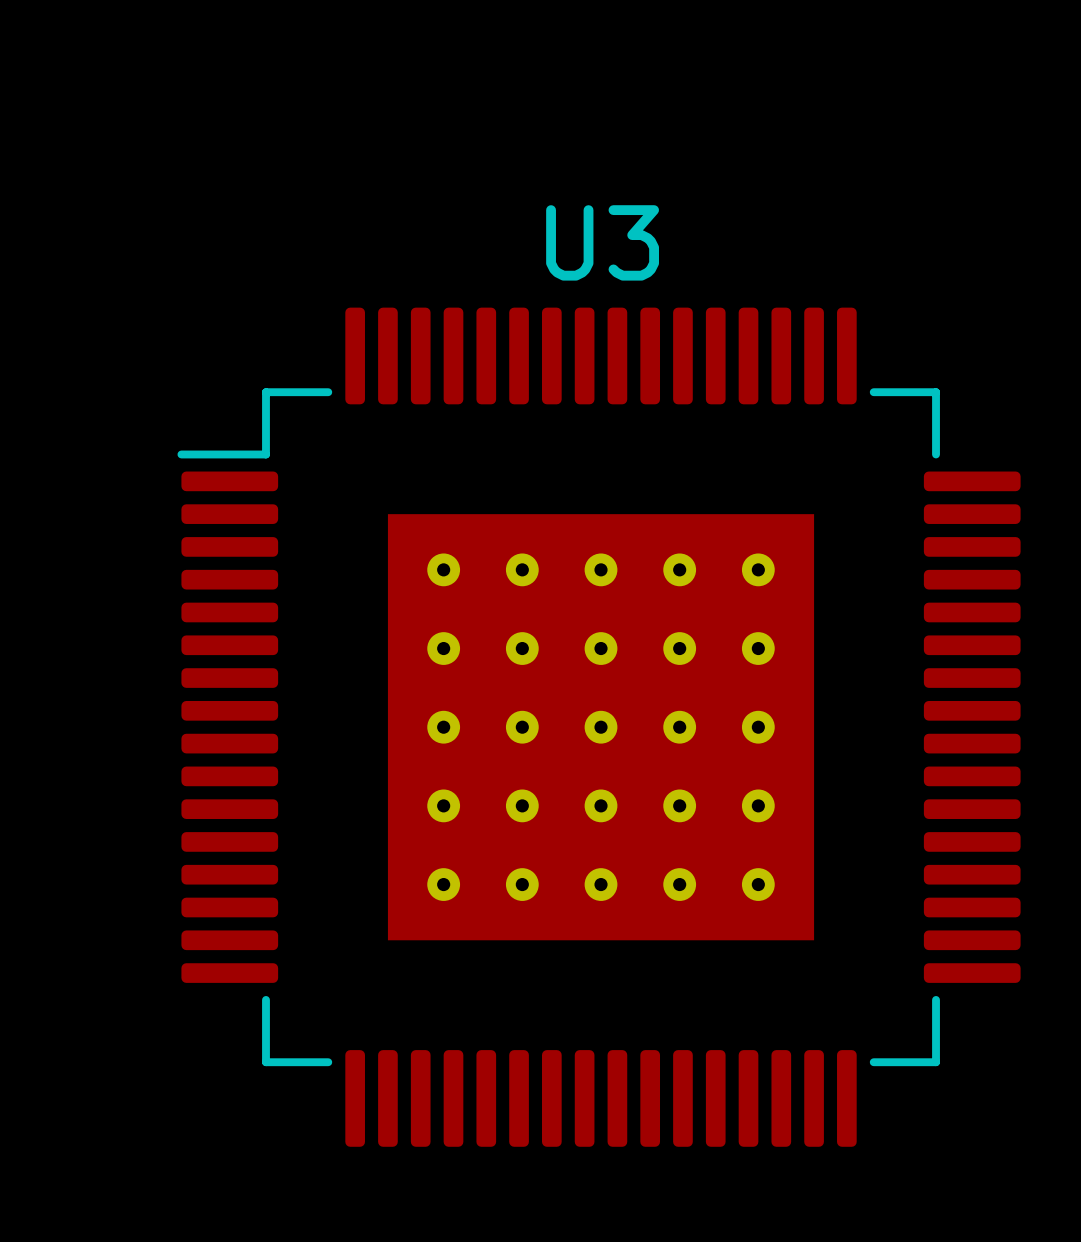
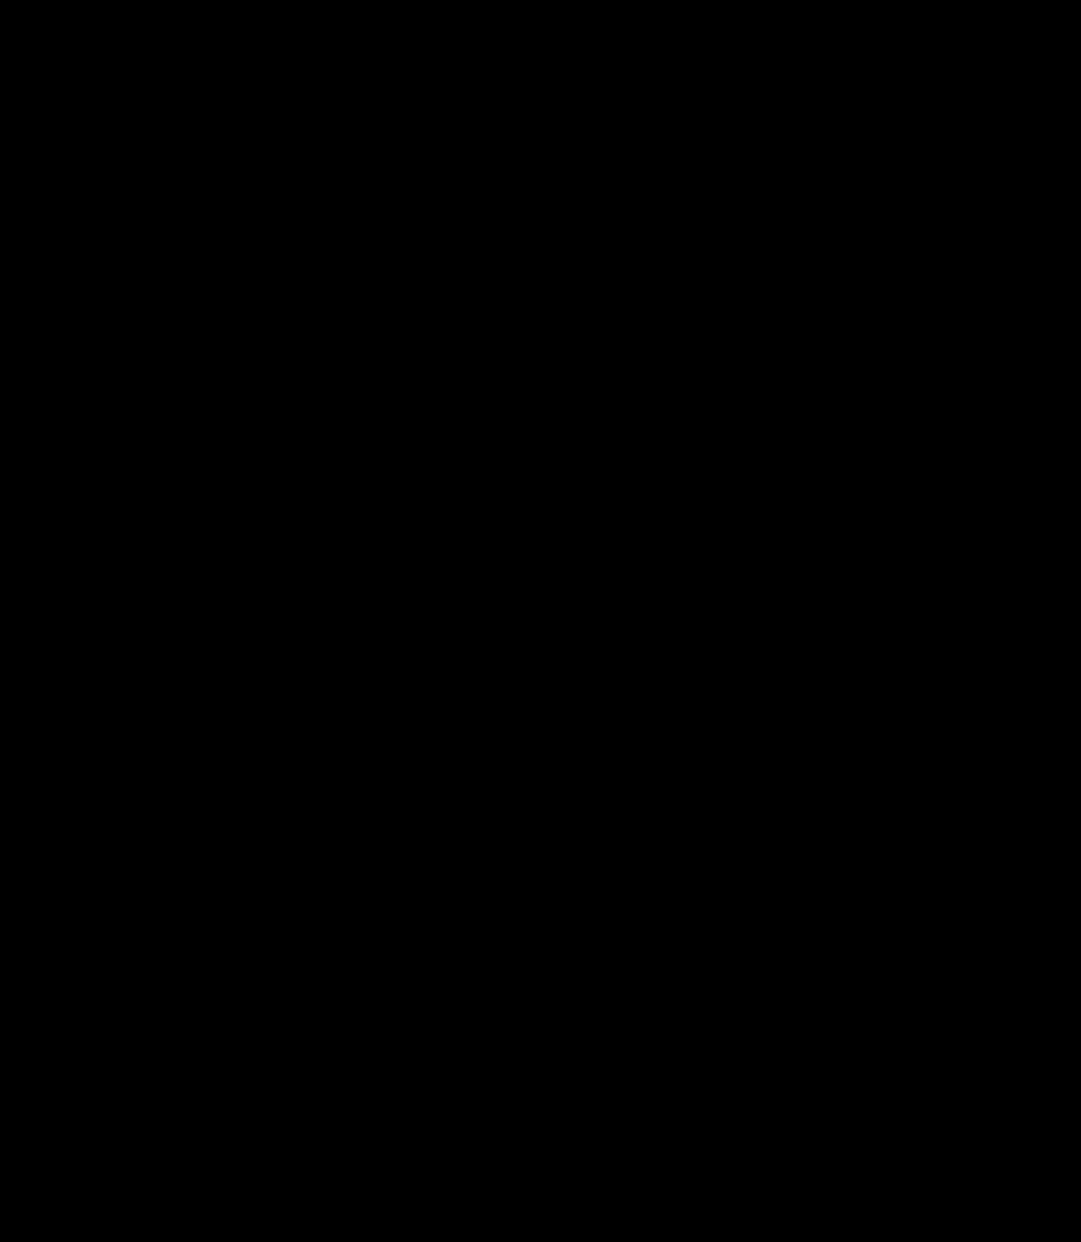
U3: (599, 727) -> none

